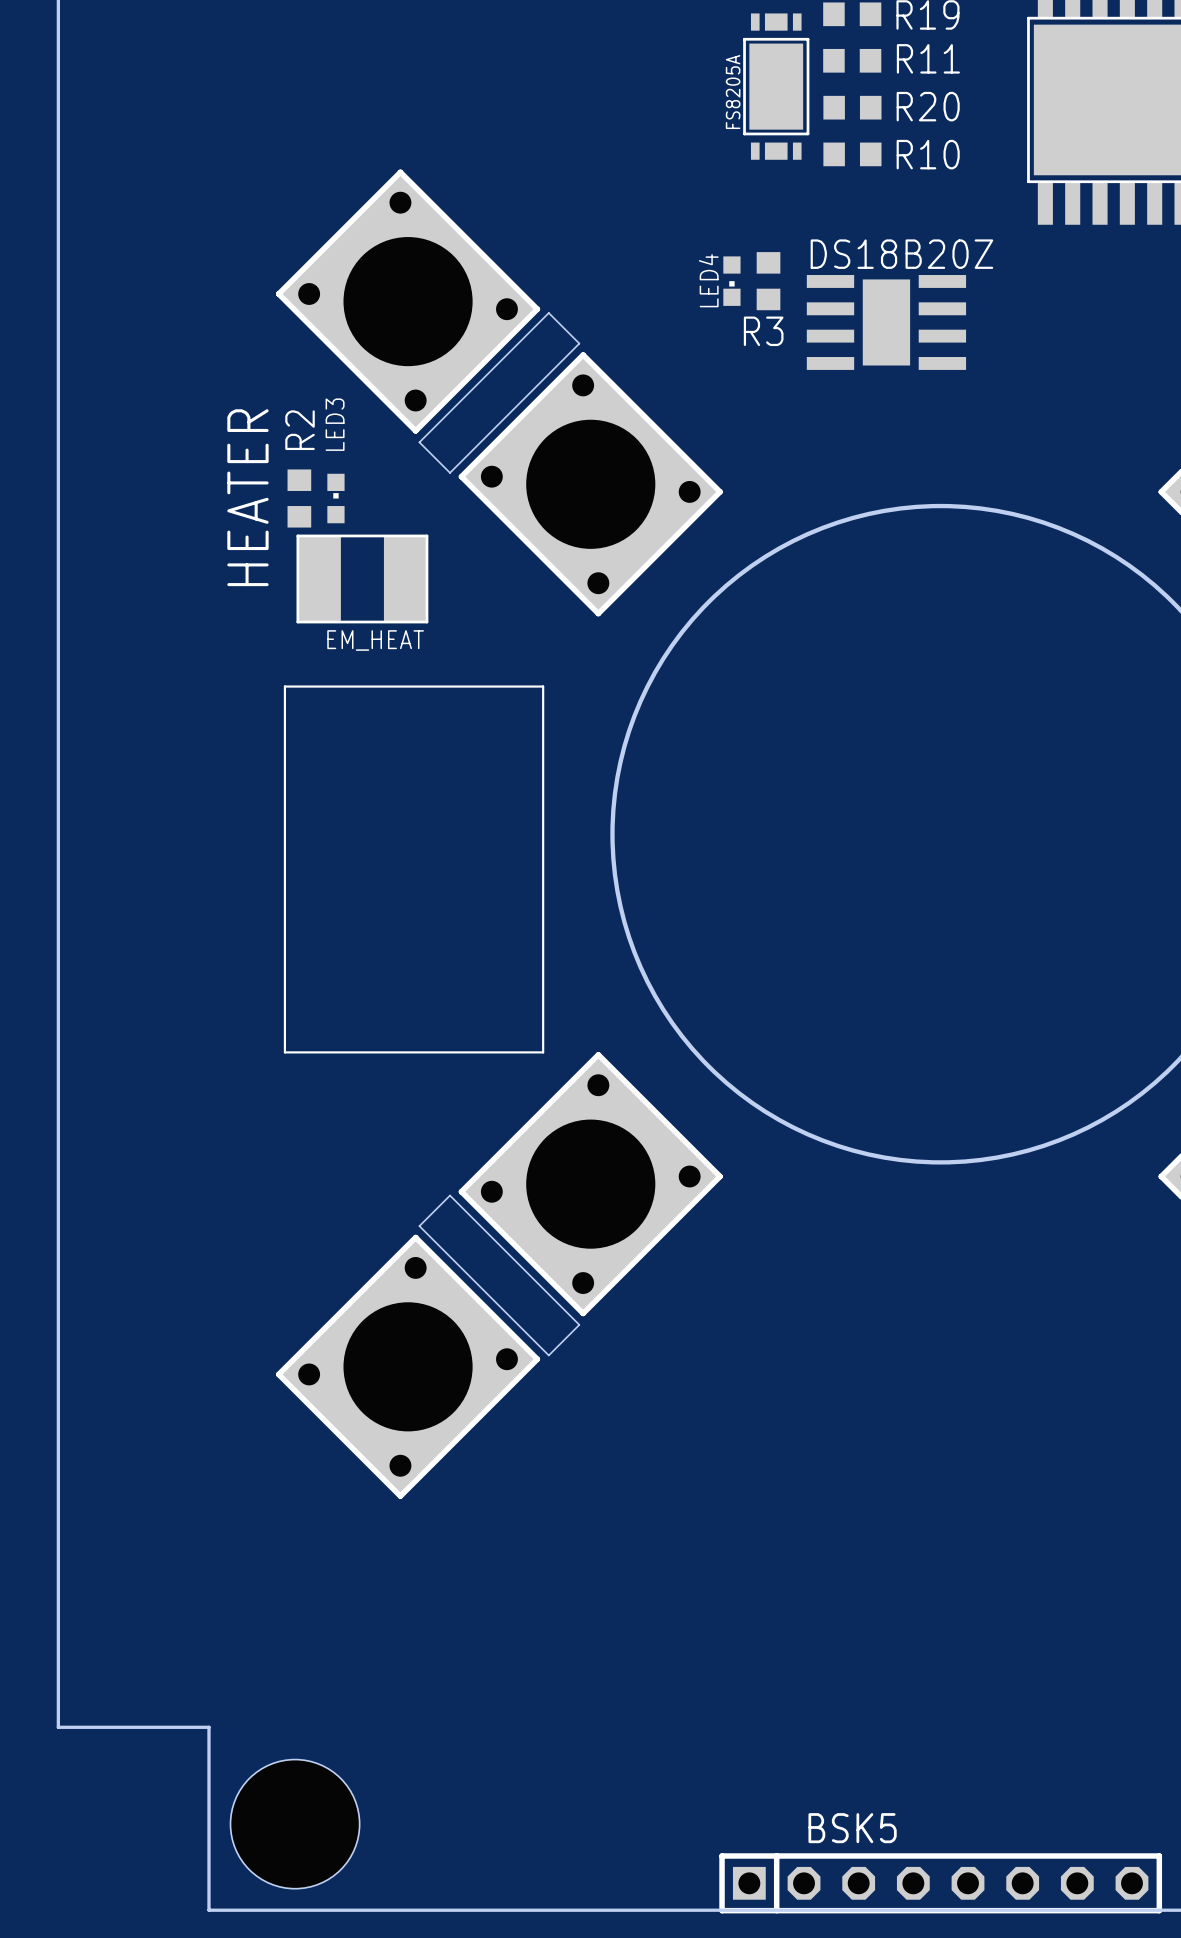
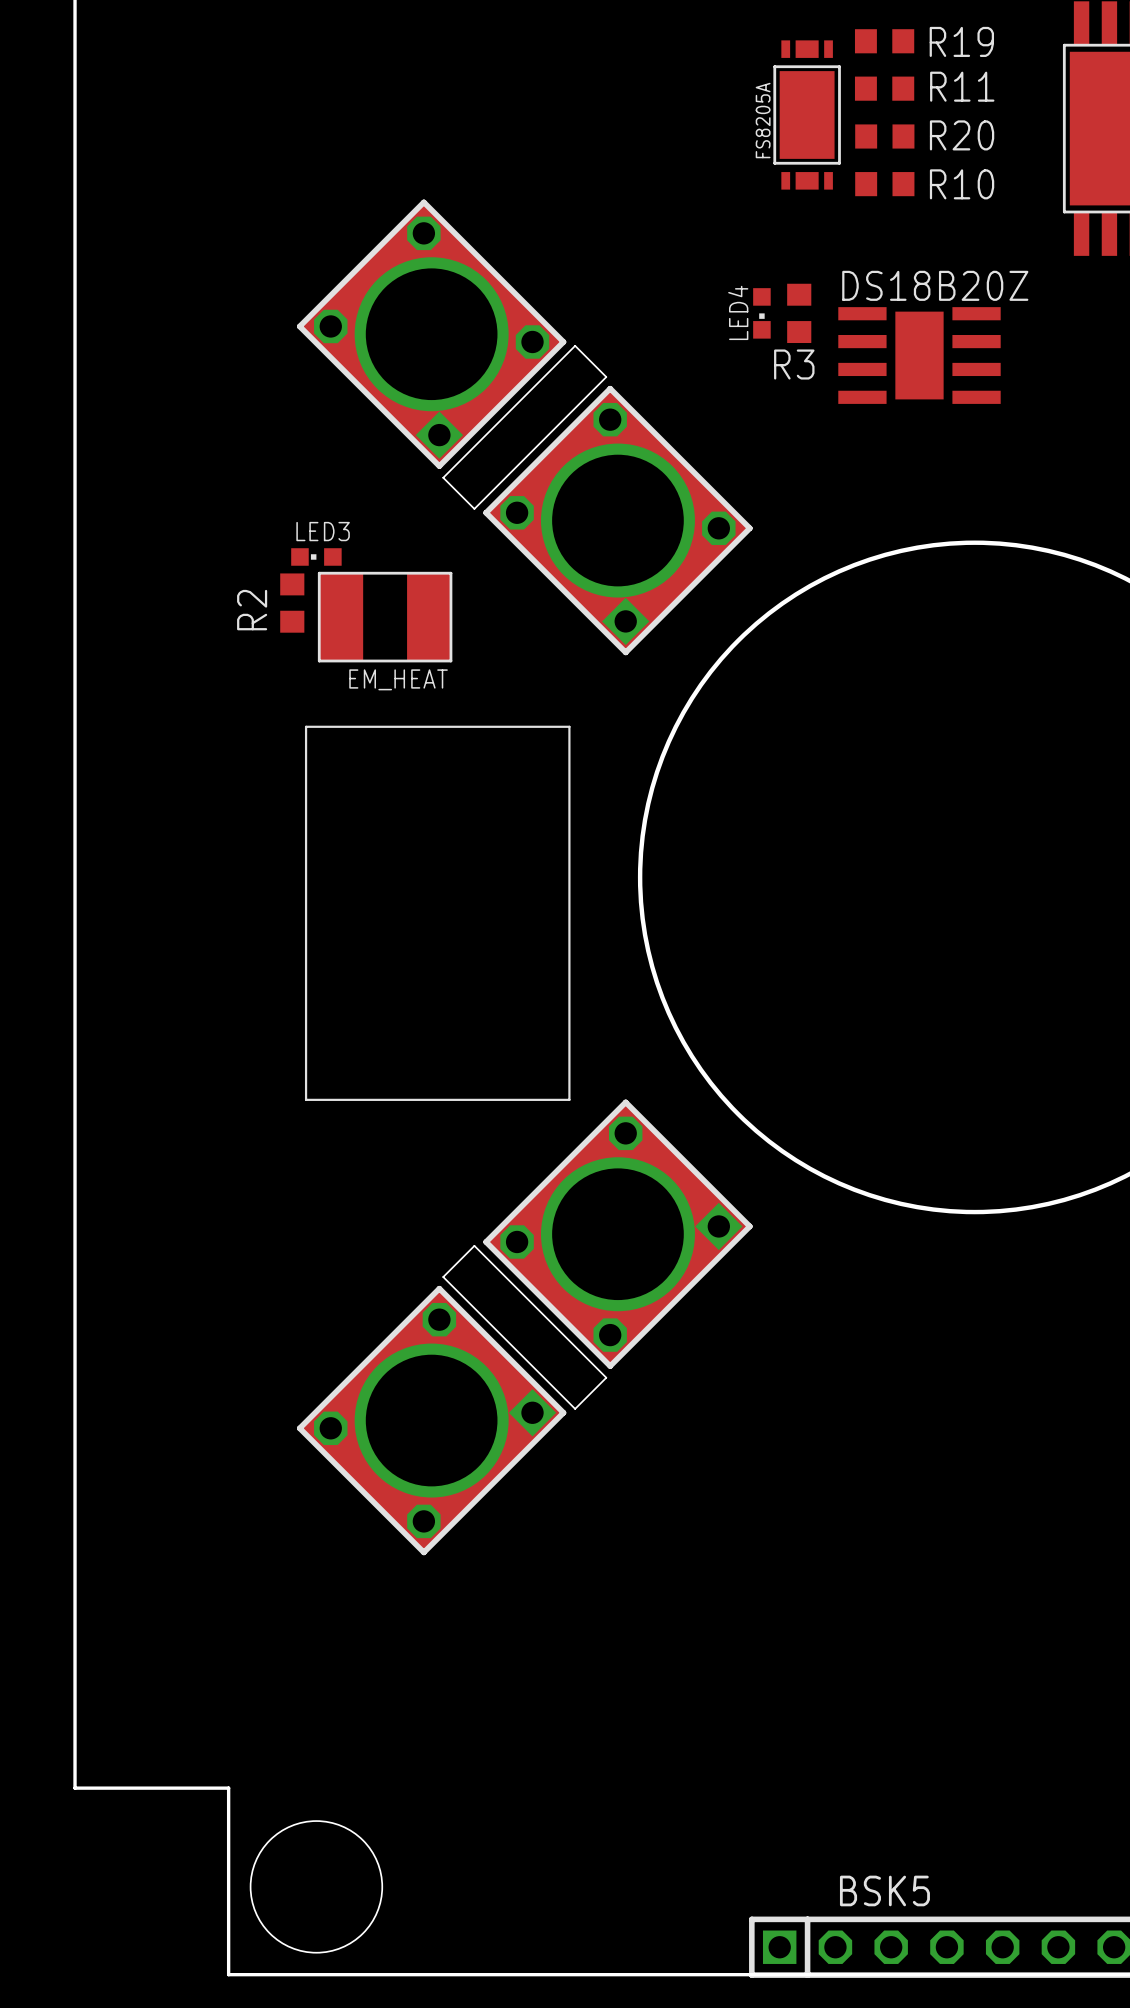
LED3 name position: LED3 (335, 424) -> LED3 (323, 531)
R2 name position: R2 (300, 430) -> R2 (252, 610)
text: HEATER (247, 497) -> none
R2 position: (299, 498) -> (292, 603)
LED3 rotation: 0° (335, 498) -> 90° counterclockwise (316, 556)
LED3 position: (335, 498) -> (316, 556)

